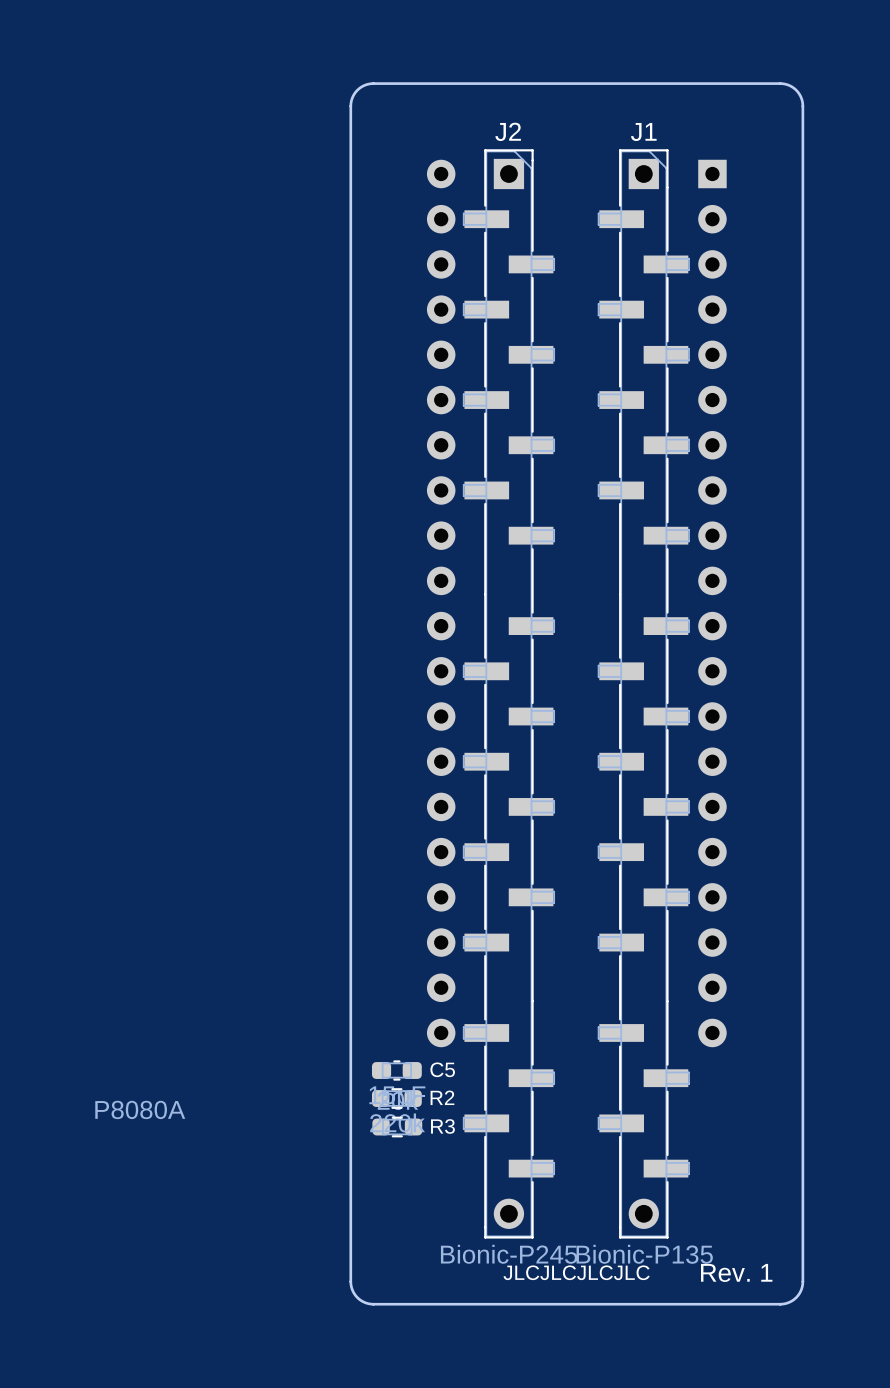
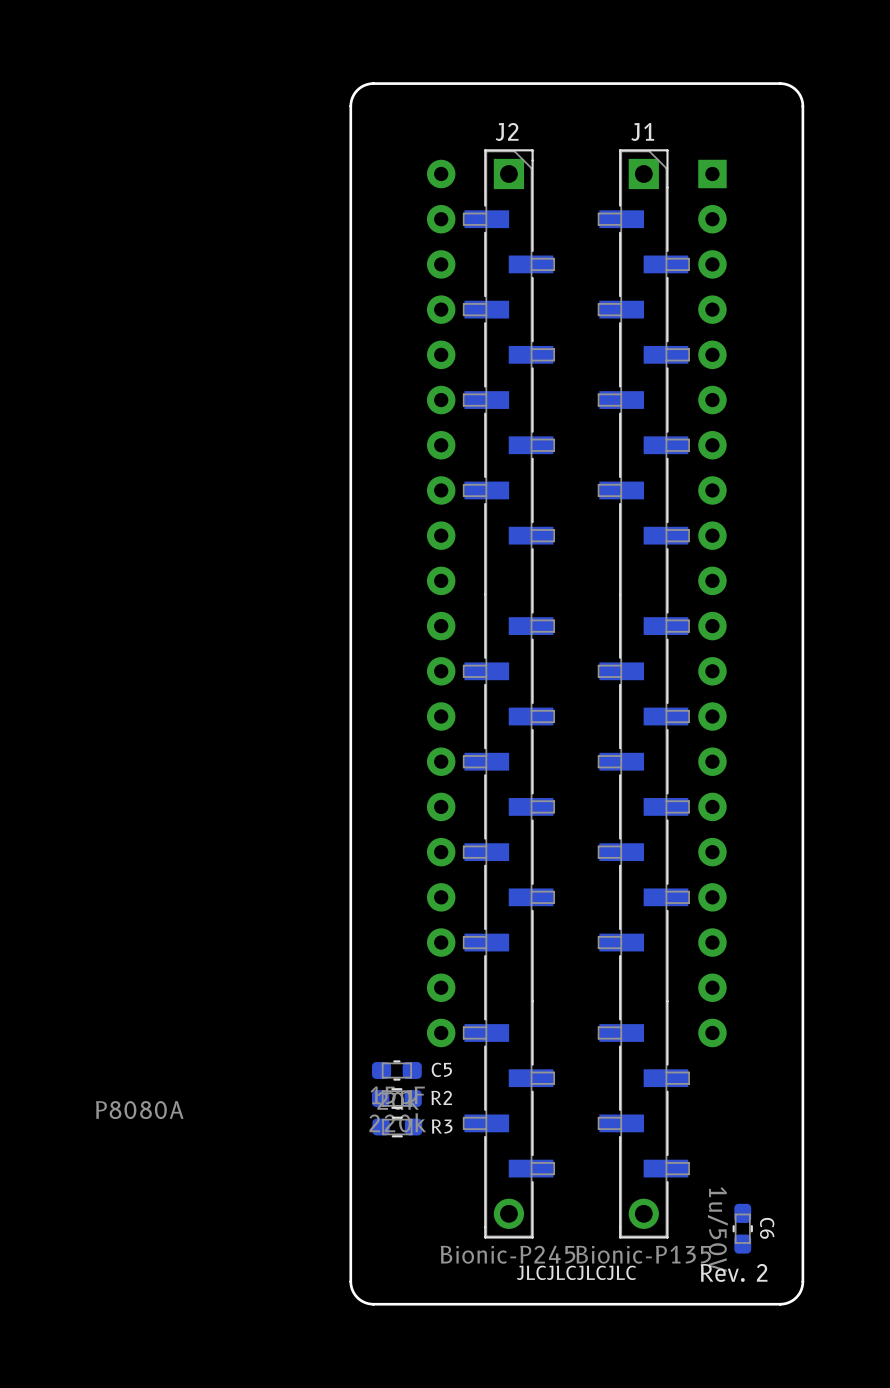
C6: none -> 1u/50V (742, 1228)
text: Rev. 1 (736, 1272) -> Rev. 2 (734, 1272)

